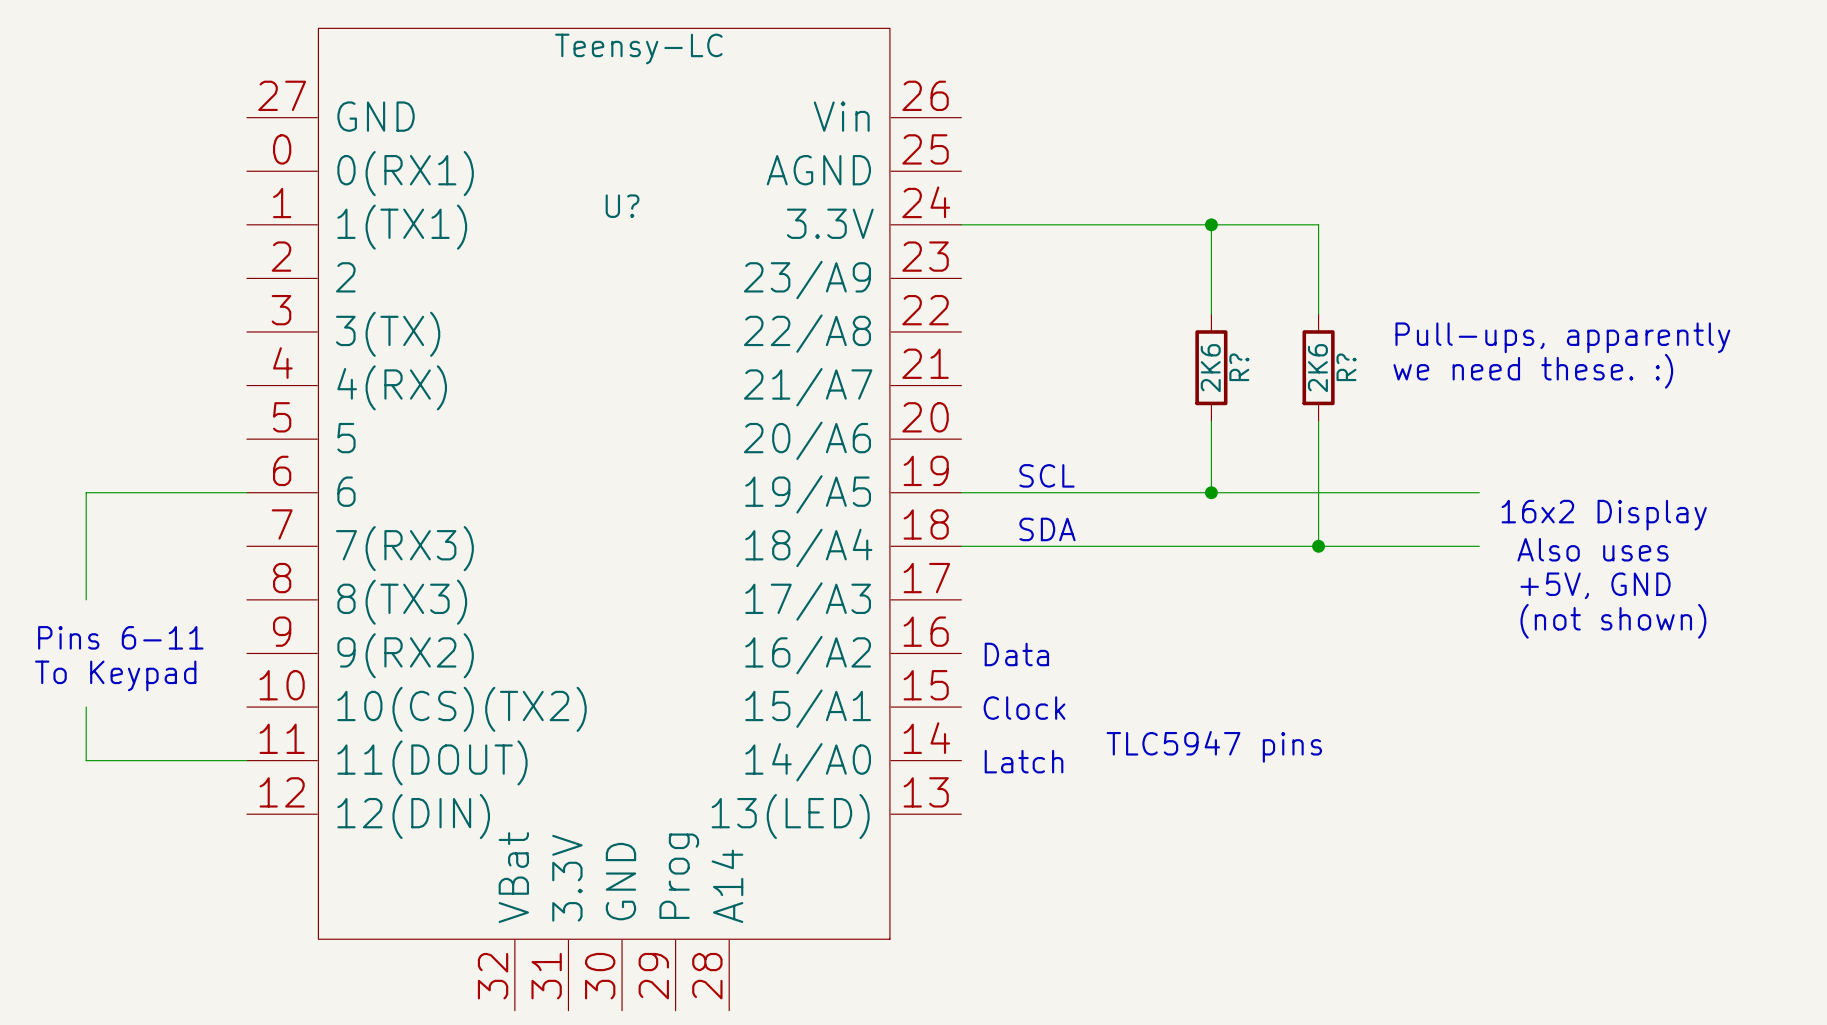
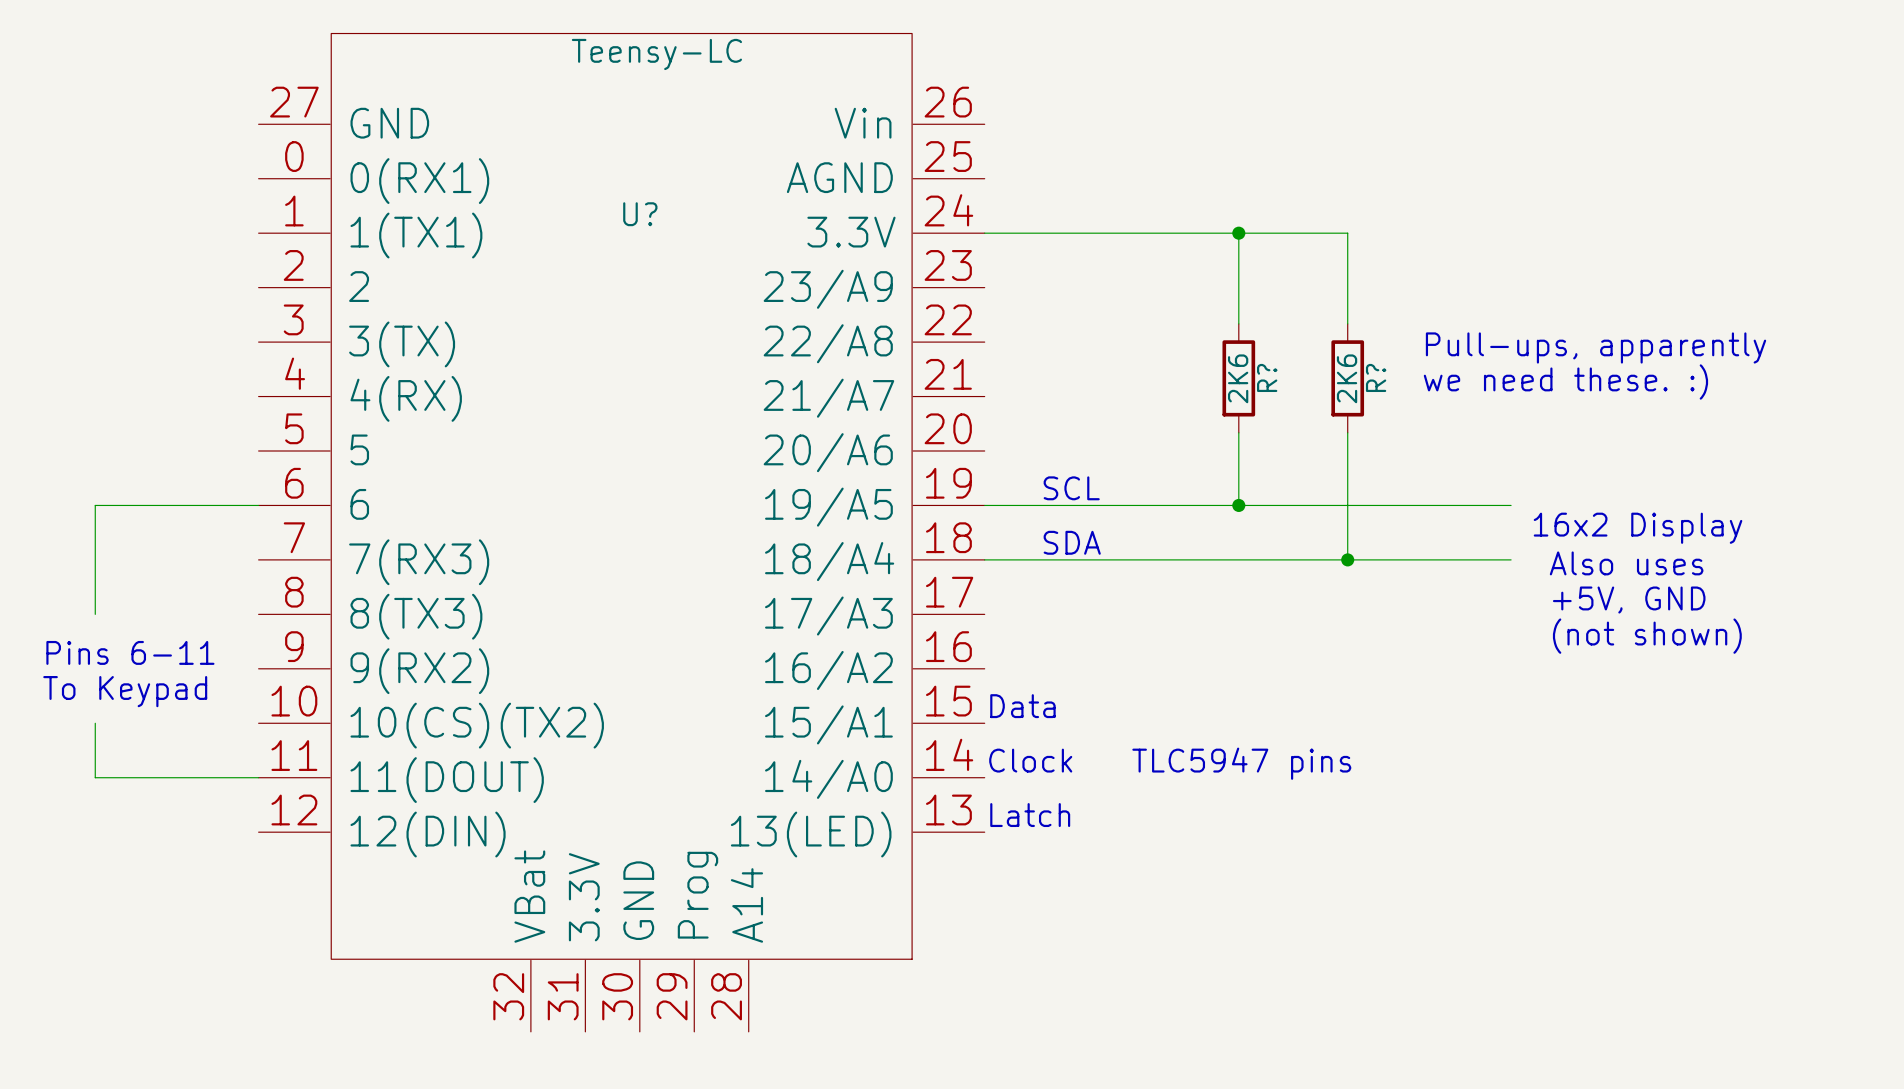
text position: Data (1016, 654) -> Data (1022, 706)
text position: Clock (1024, 708) -> Clock (1030, 760)
text position: Latch (1024, 761) -> Latch (1030, 815)

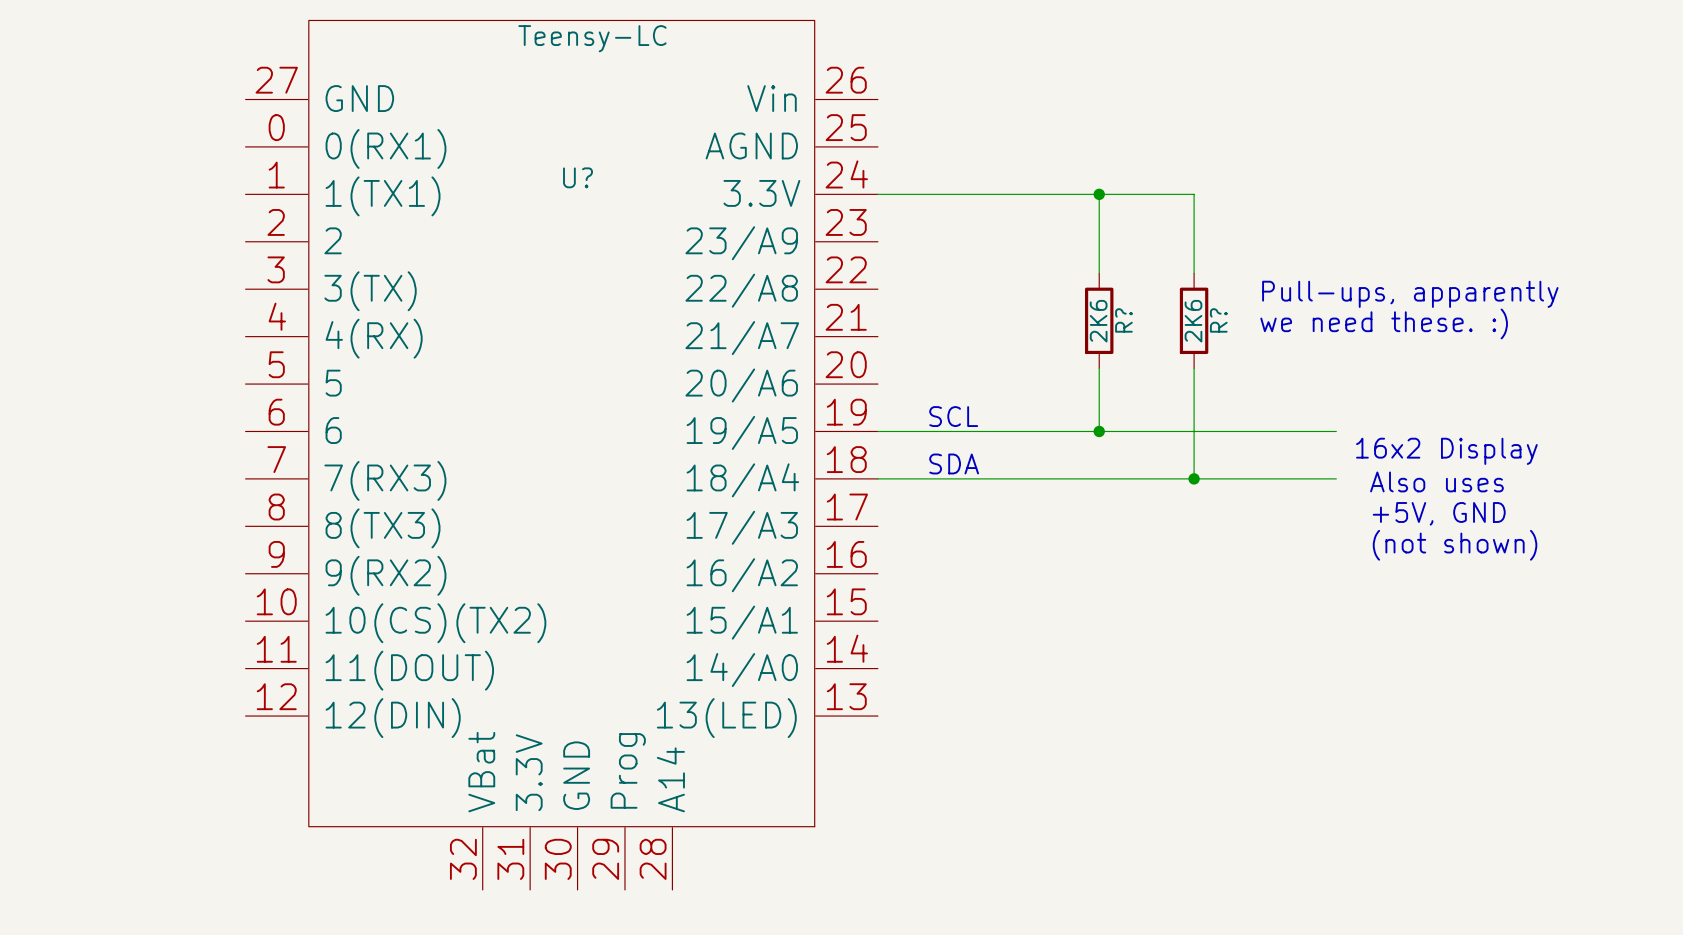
wire: (258, 505) (95, 505) (95, 614) -> none
text: Pins 6-11 (130, 652) -> none
text: To Keypad (125, 691) -> none
text: Data (1022, 706) -> none
wire: (95, 723) (95, 777) (258, 777) -> none
text: Clock (1030, 760) -> none
text: TLC5947 pins (1241, 763) -> none
text: Latch (1030, 815) -> none

